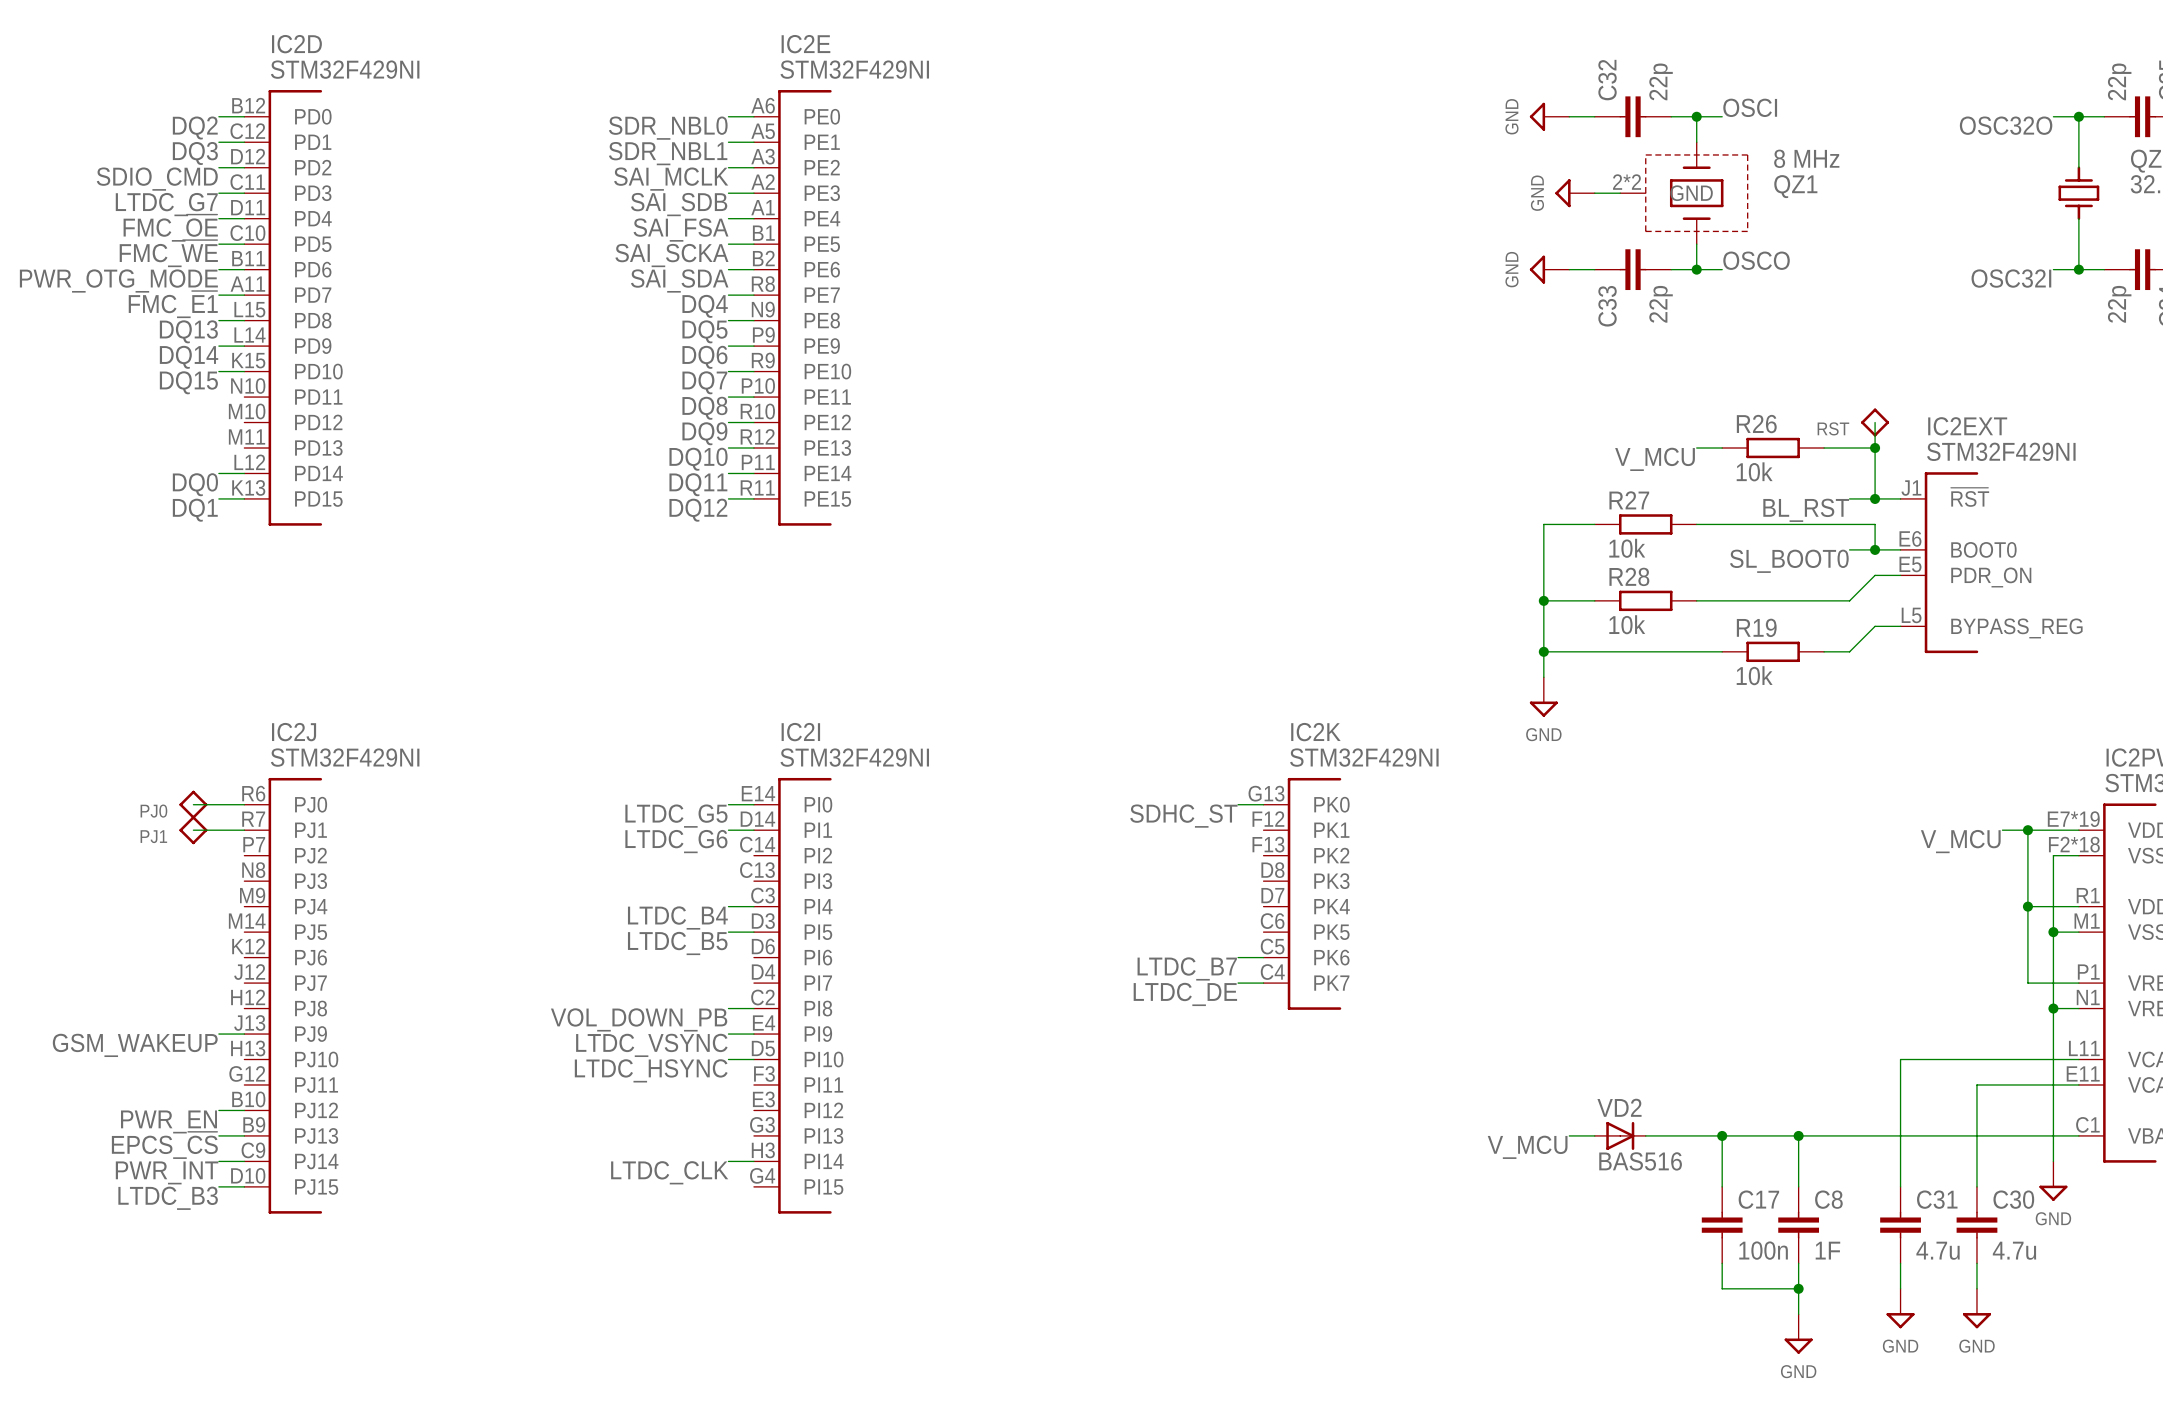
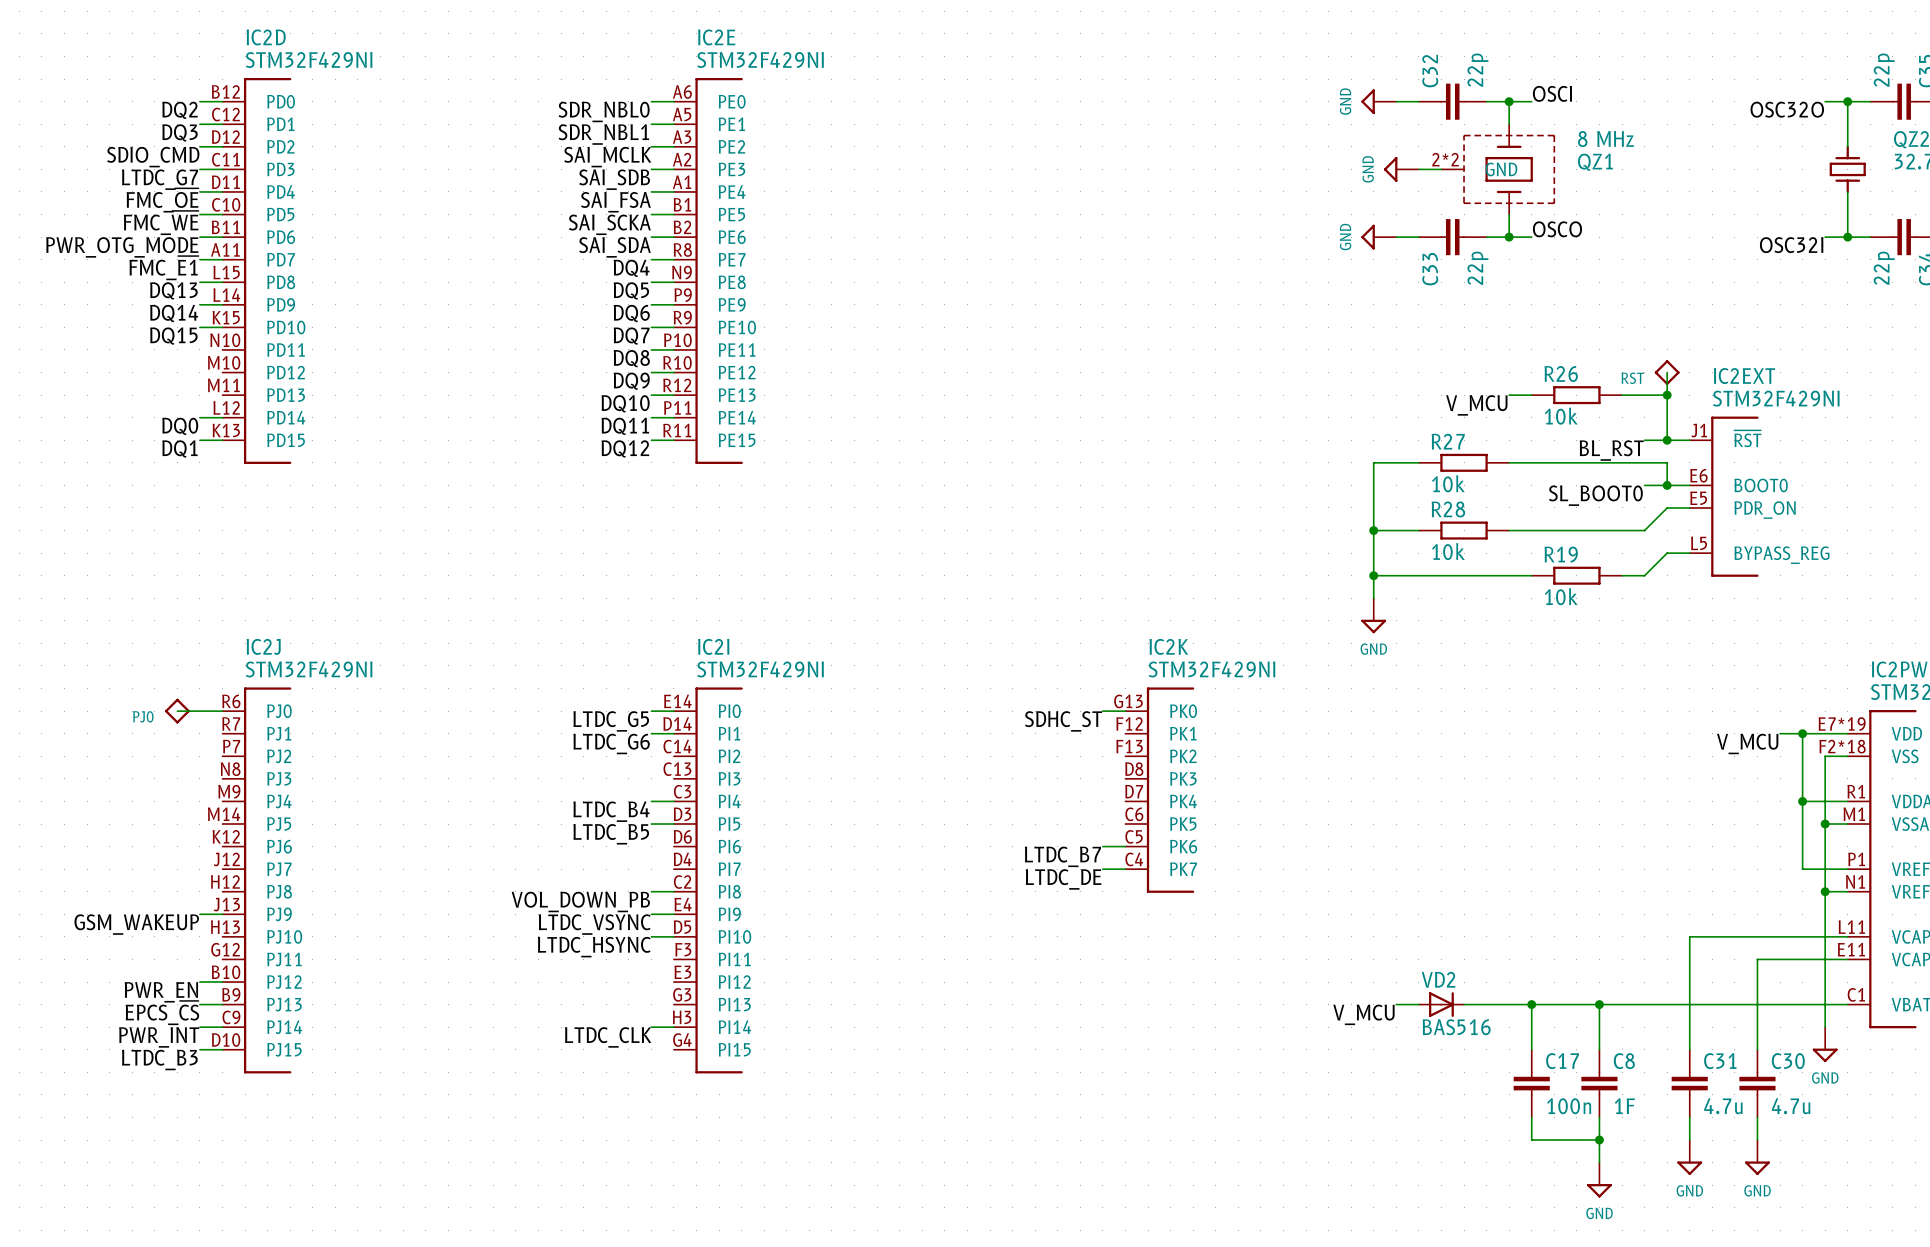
wire: (193, 830) (244, 830) -> none
part: PJ1 (193, 830) -> none

